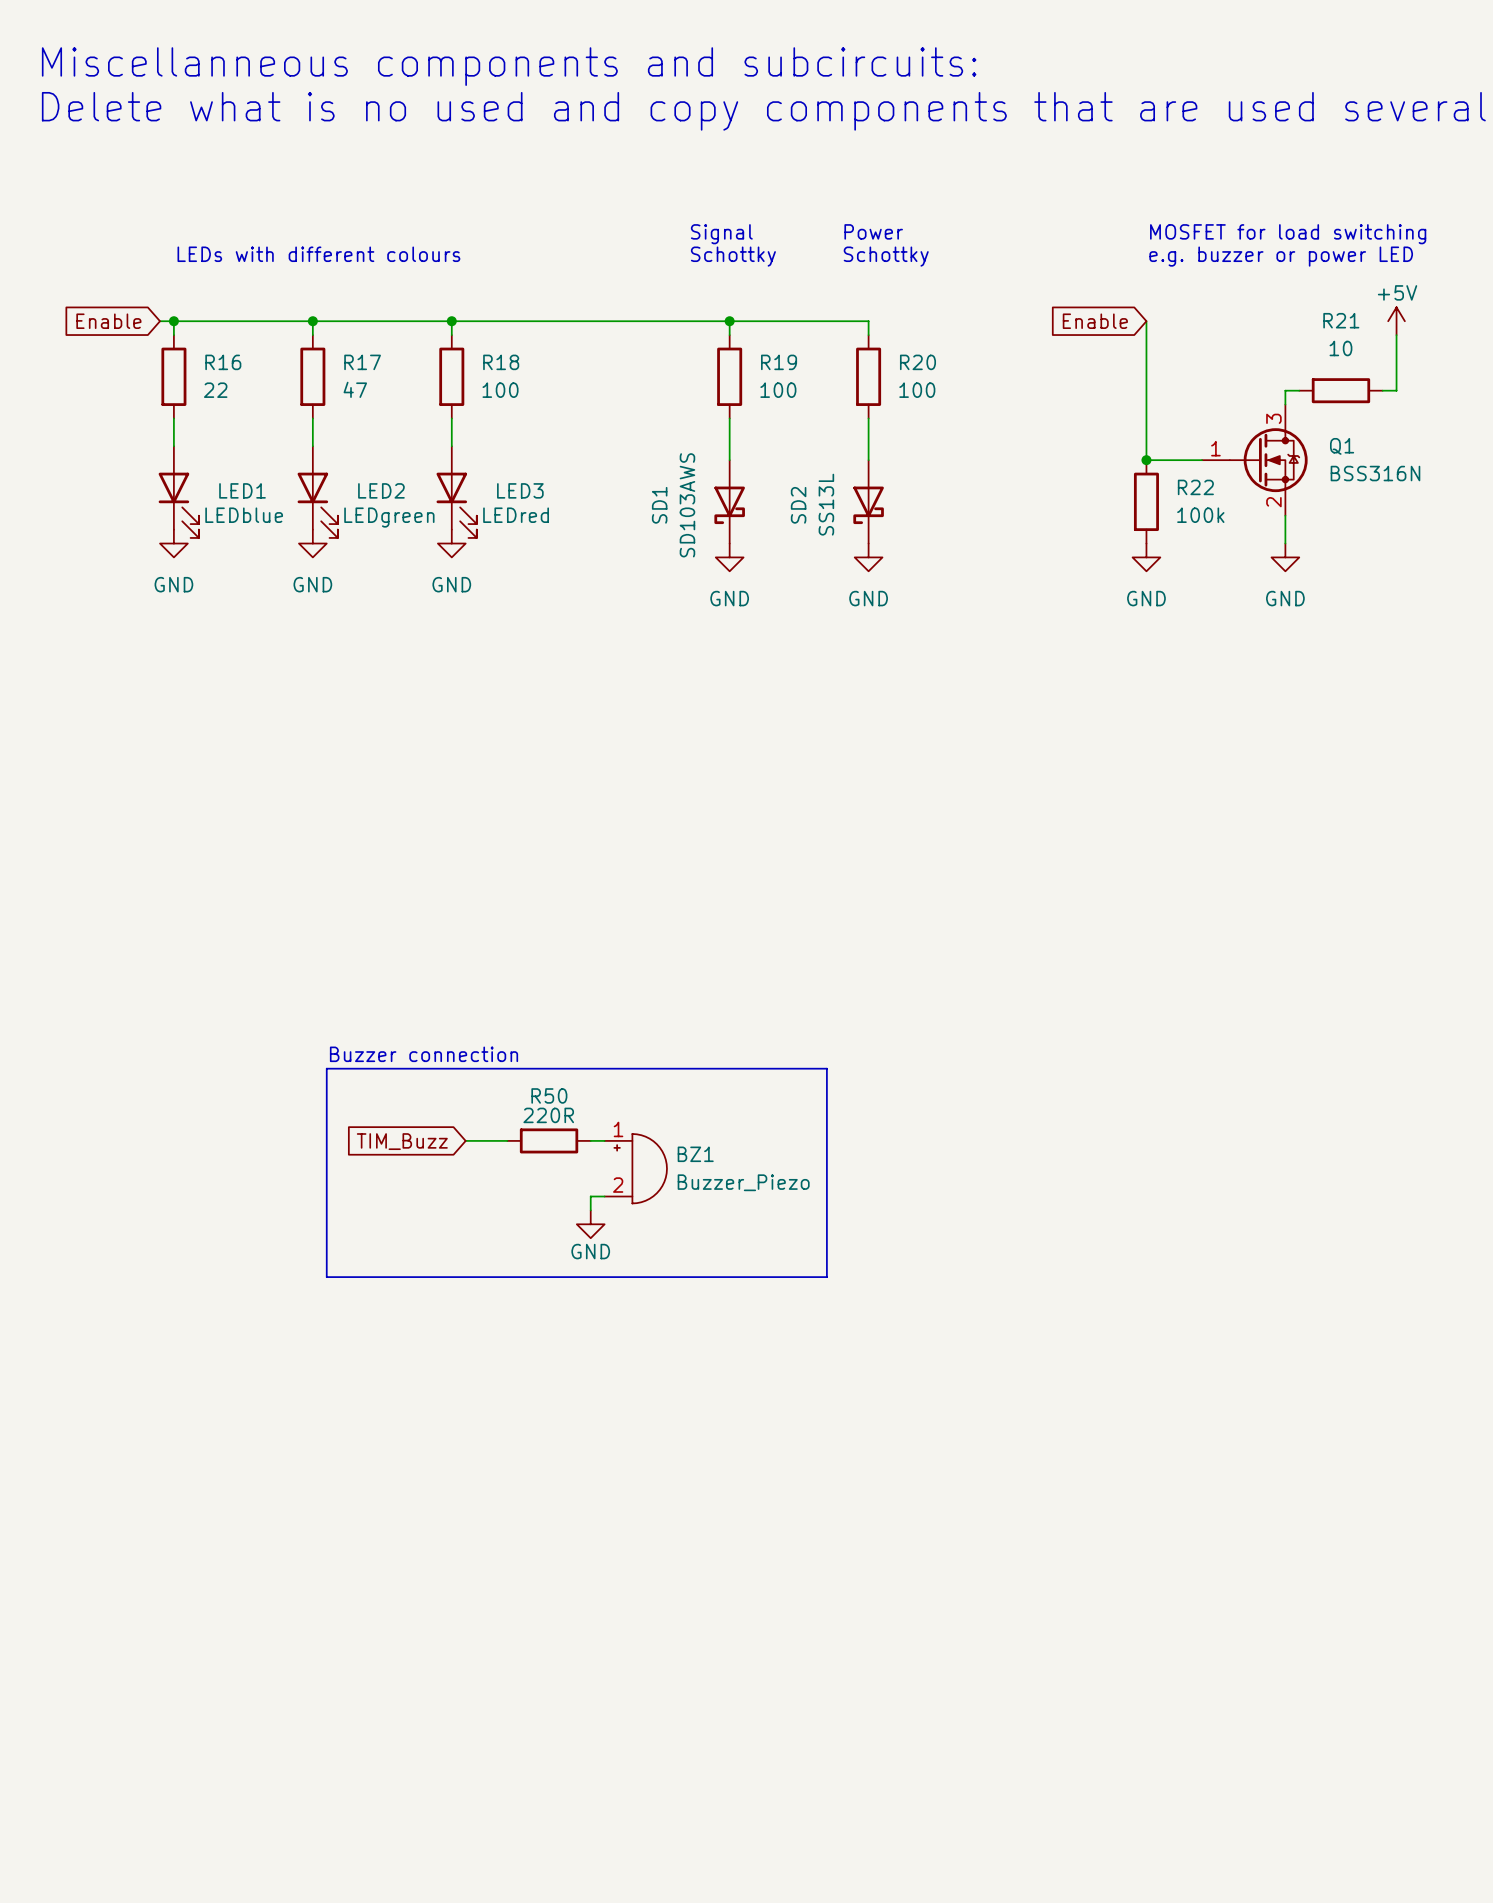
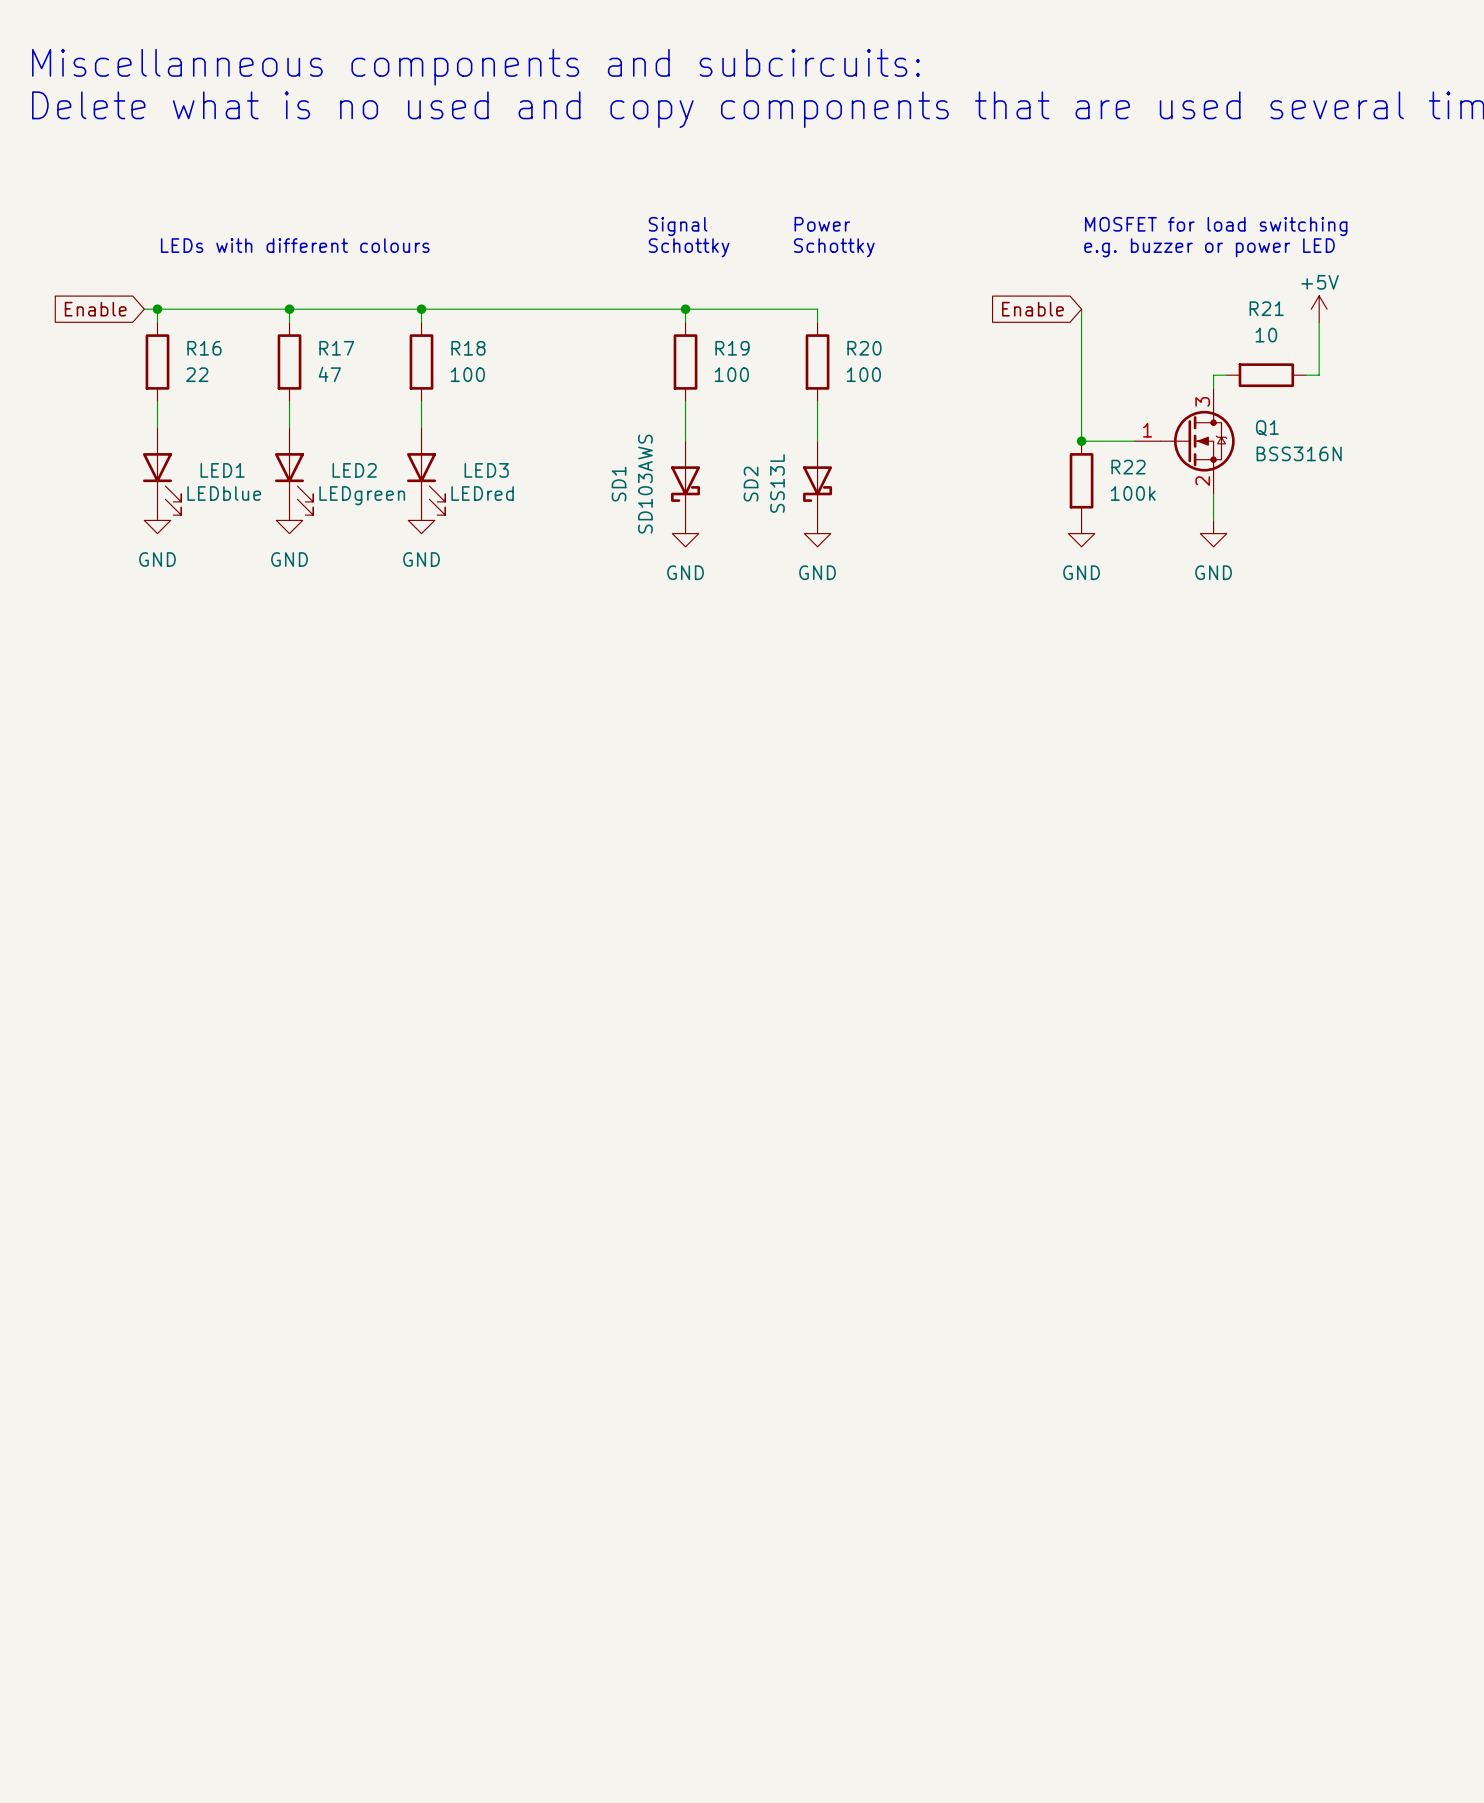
text: Buzzer connection (424, 1054) -> none
line: (326, 1068) (826, 1068) (826, 1277) (326, 1277) (326, 1068) -> none
wire: (465, 1140) (507, 1140) -> none
R50: 220R (549, 1140) -> none
wire: (590, 1140) (604, 1140) -> none
global label: TIM_Buzz (402, 1141) -> none
BZ1: Buzzer_Piezo (635, 1168) -> none
wire: (604, 1196) (590, 1196) (590, 1210) -> none
power symbol: GND (590, 1224) -> none

